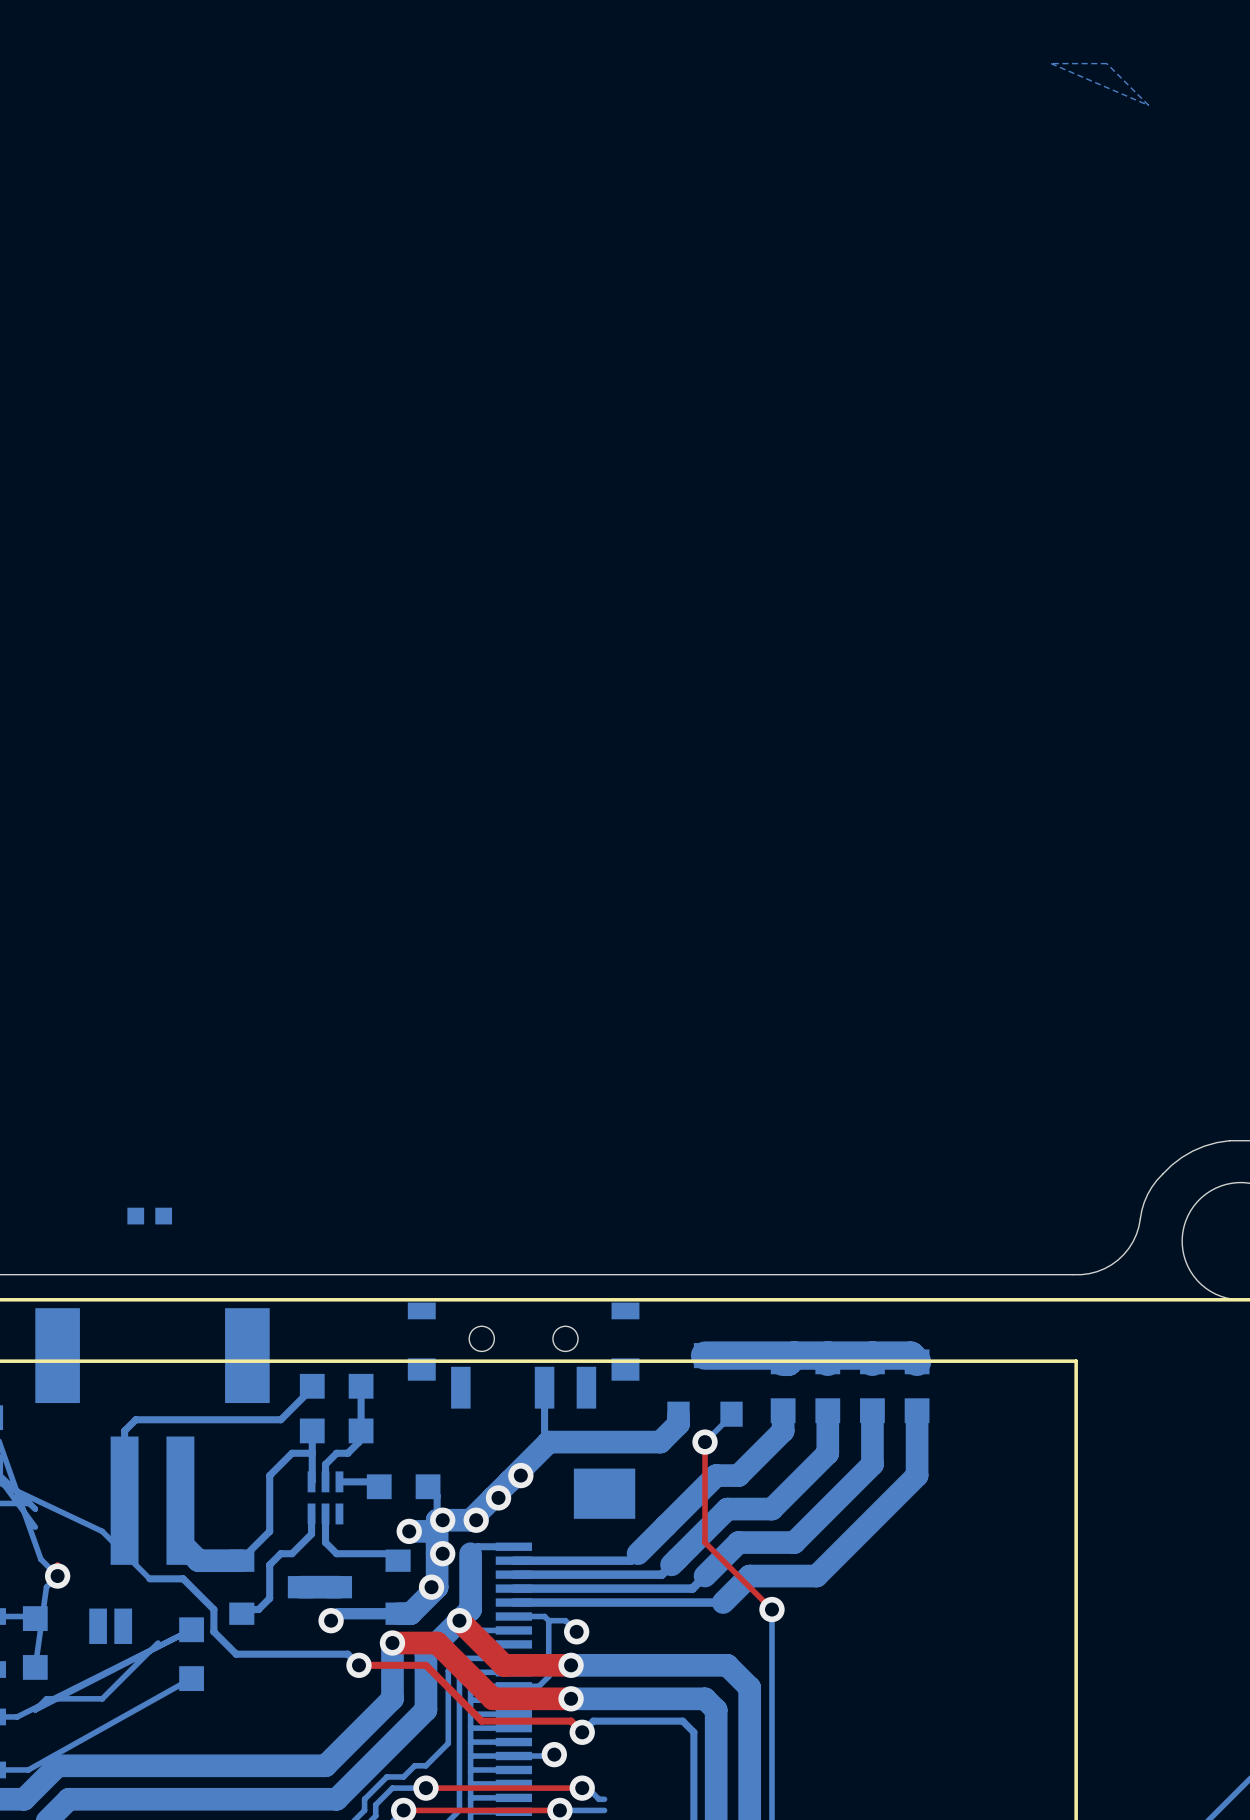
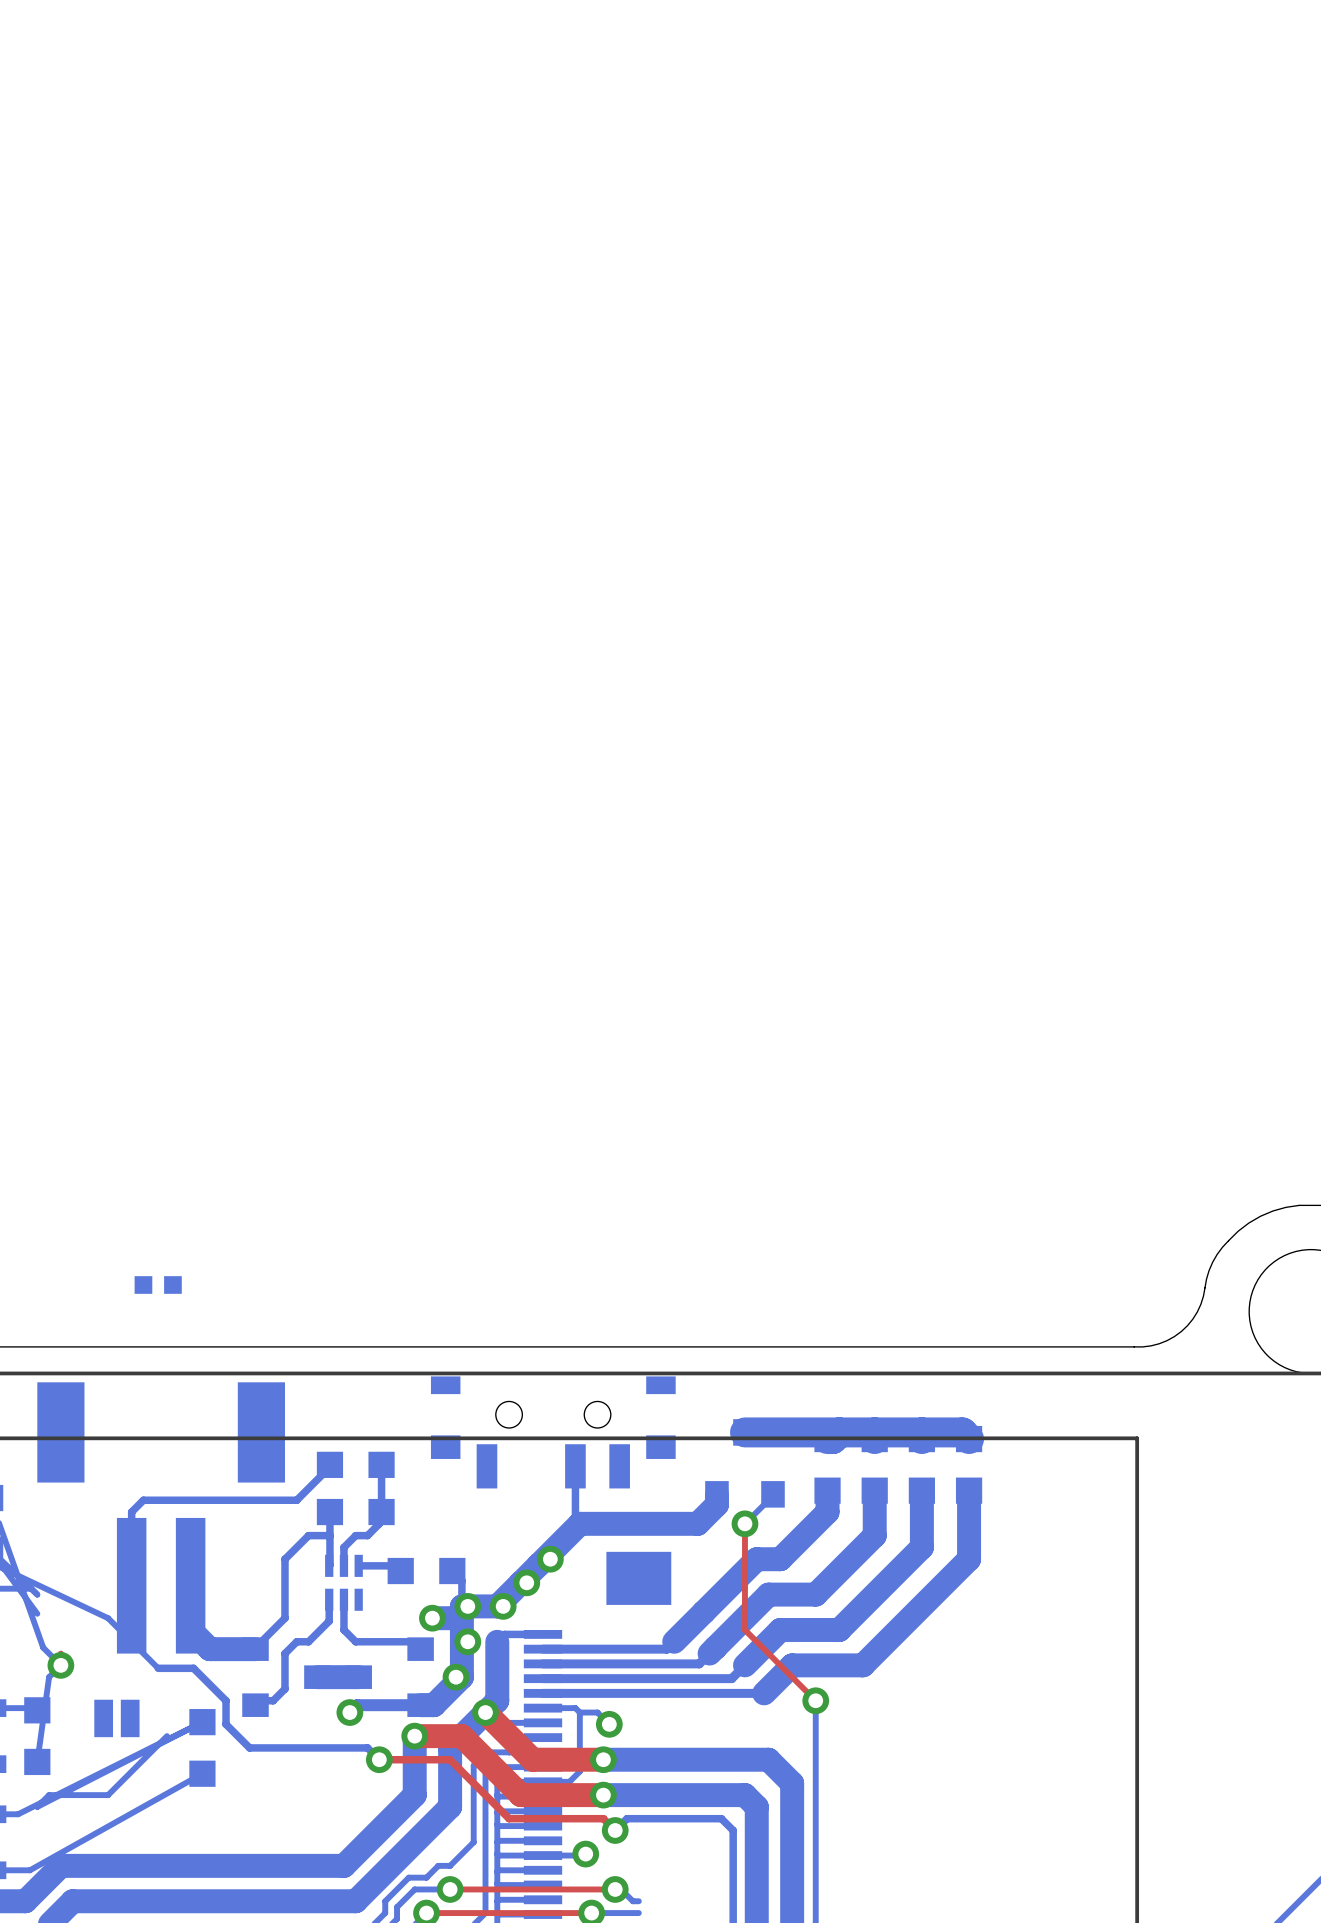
bottom zone outline: (1051, 63) (1148, 105) (1106, 63) (1051, 63) -> none

